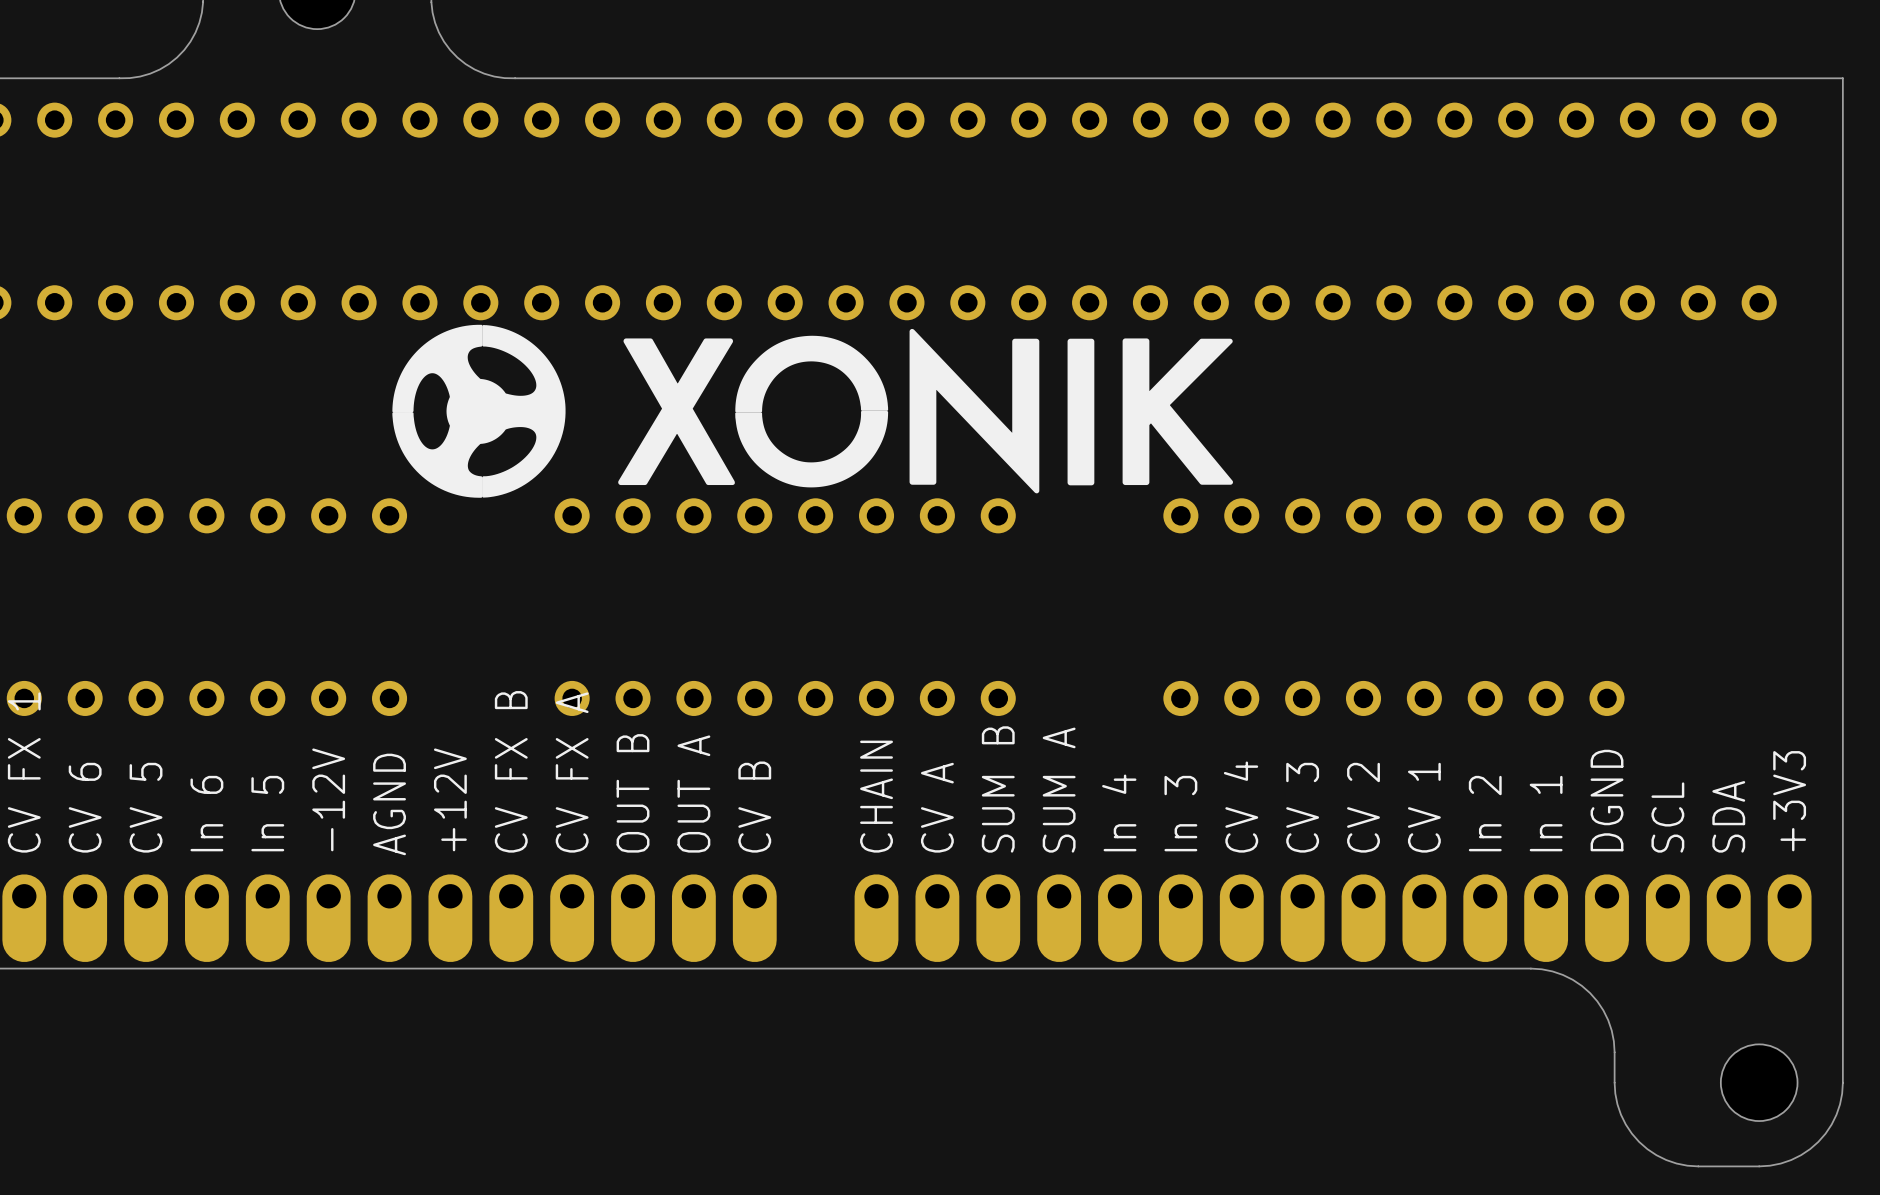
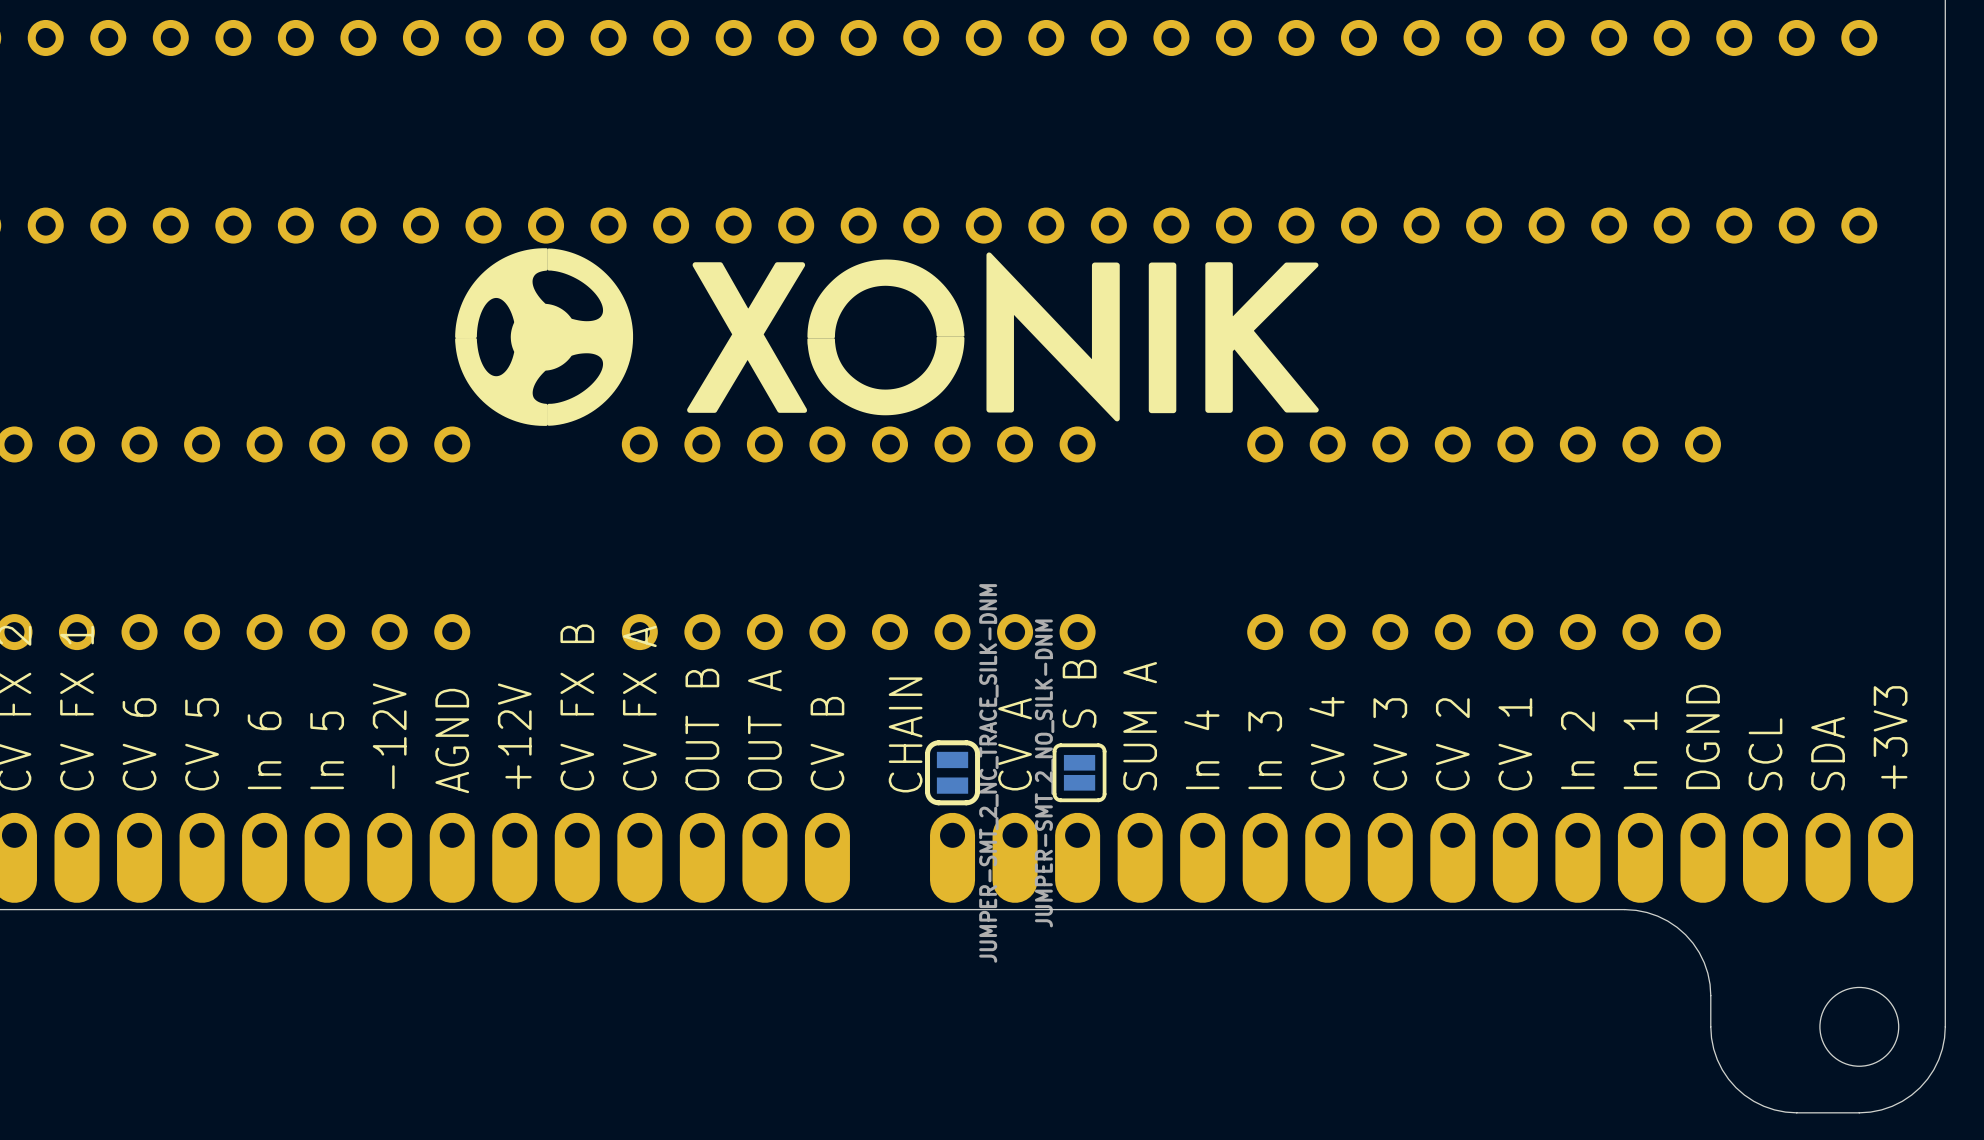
text: SUM B (998, 789) -> S B (1079, 693)
text position: CHAIN (876, 796) -> CHAIN (905, 734)
part: none -> JUMPER-SMT_2_NC_TRACE_SILK-DNM (952, 772)
part: none -> JUMPER-SMT_2_NO_SILK-DNM (1079, 772)

